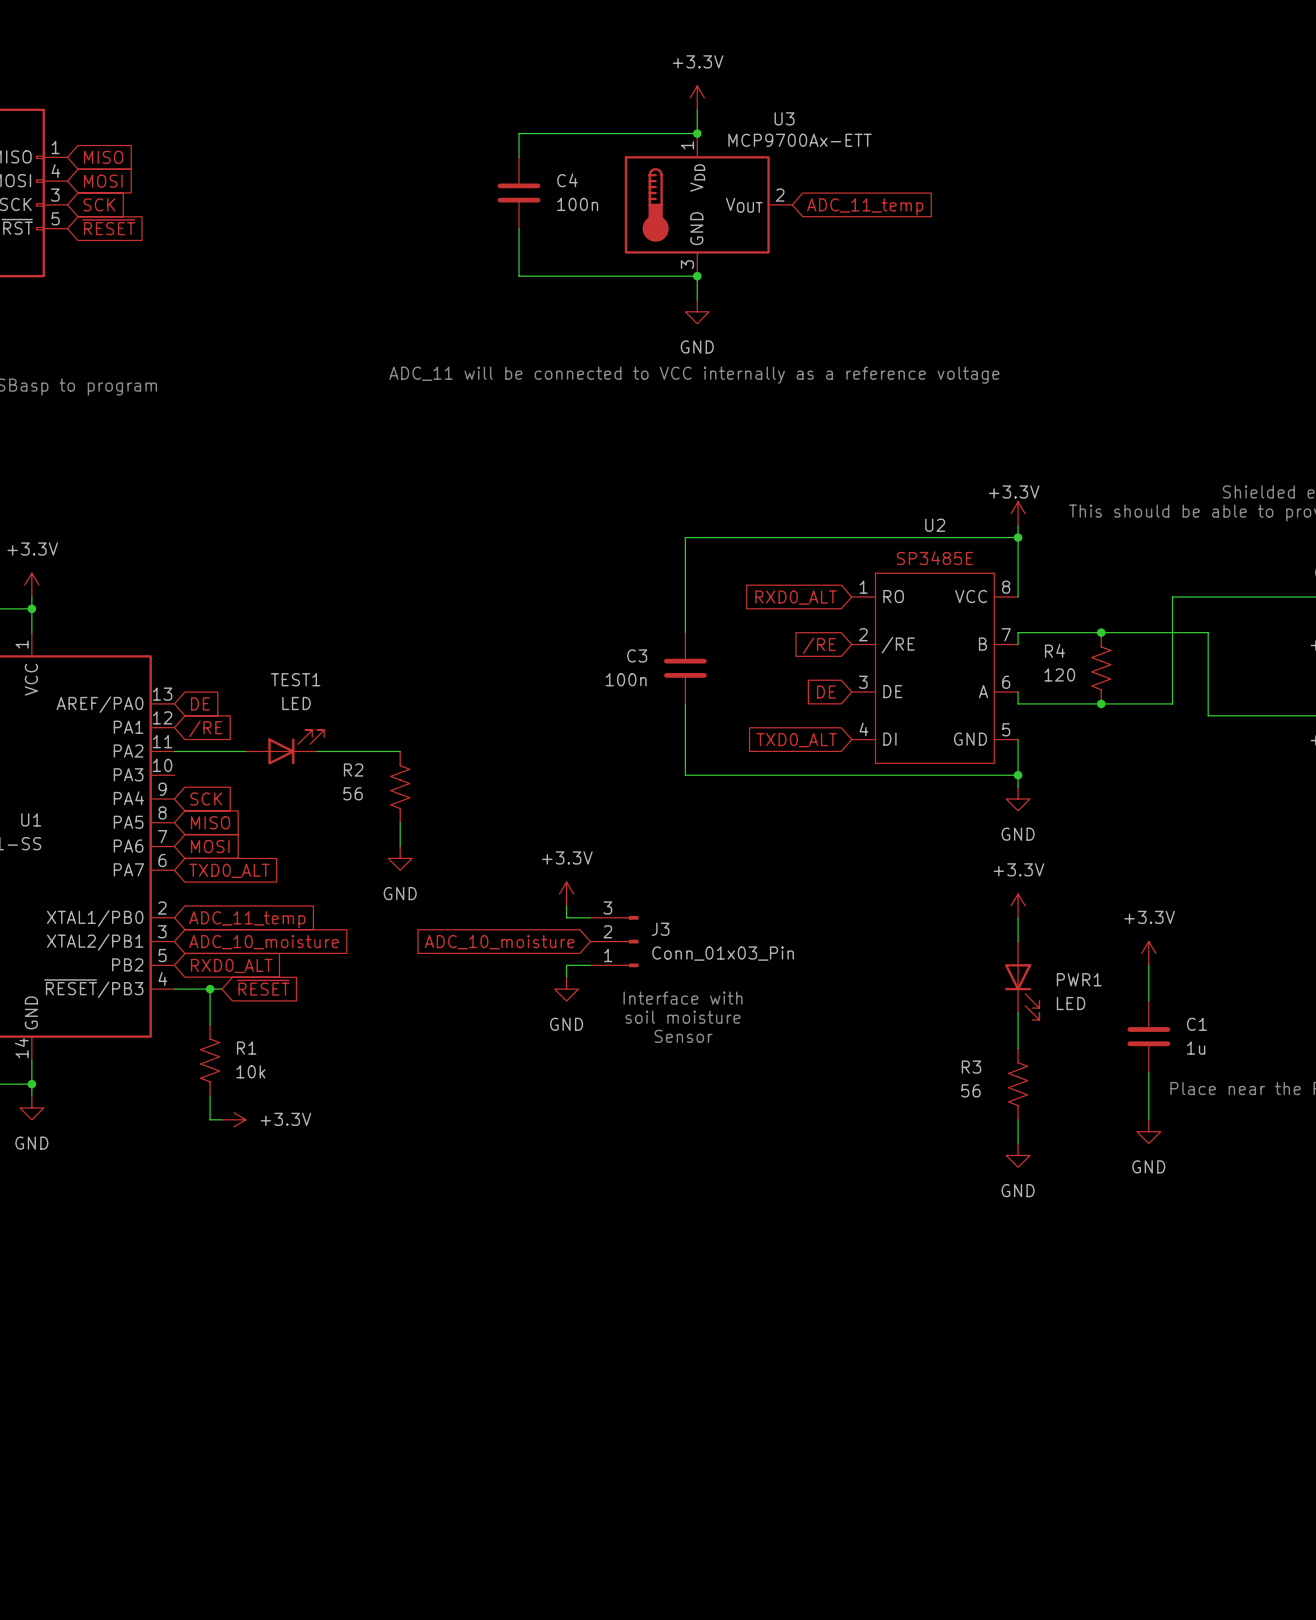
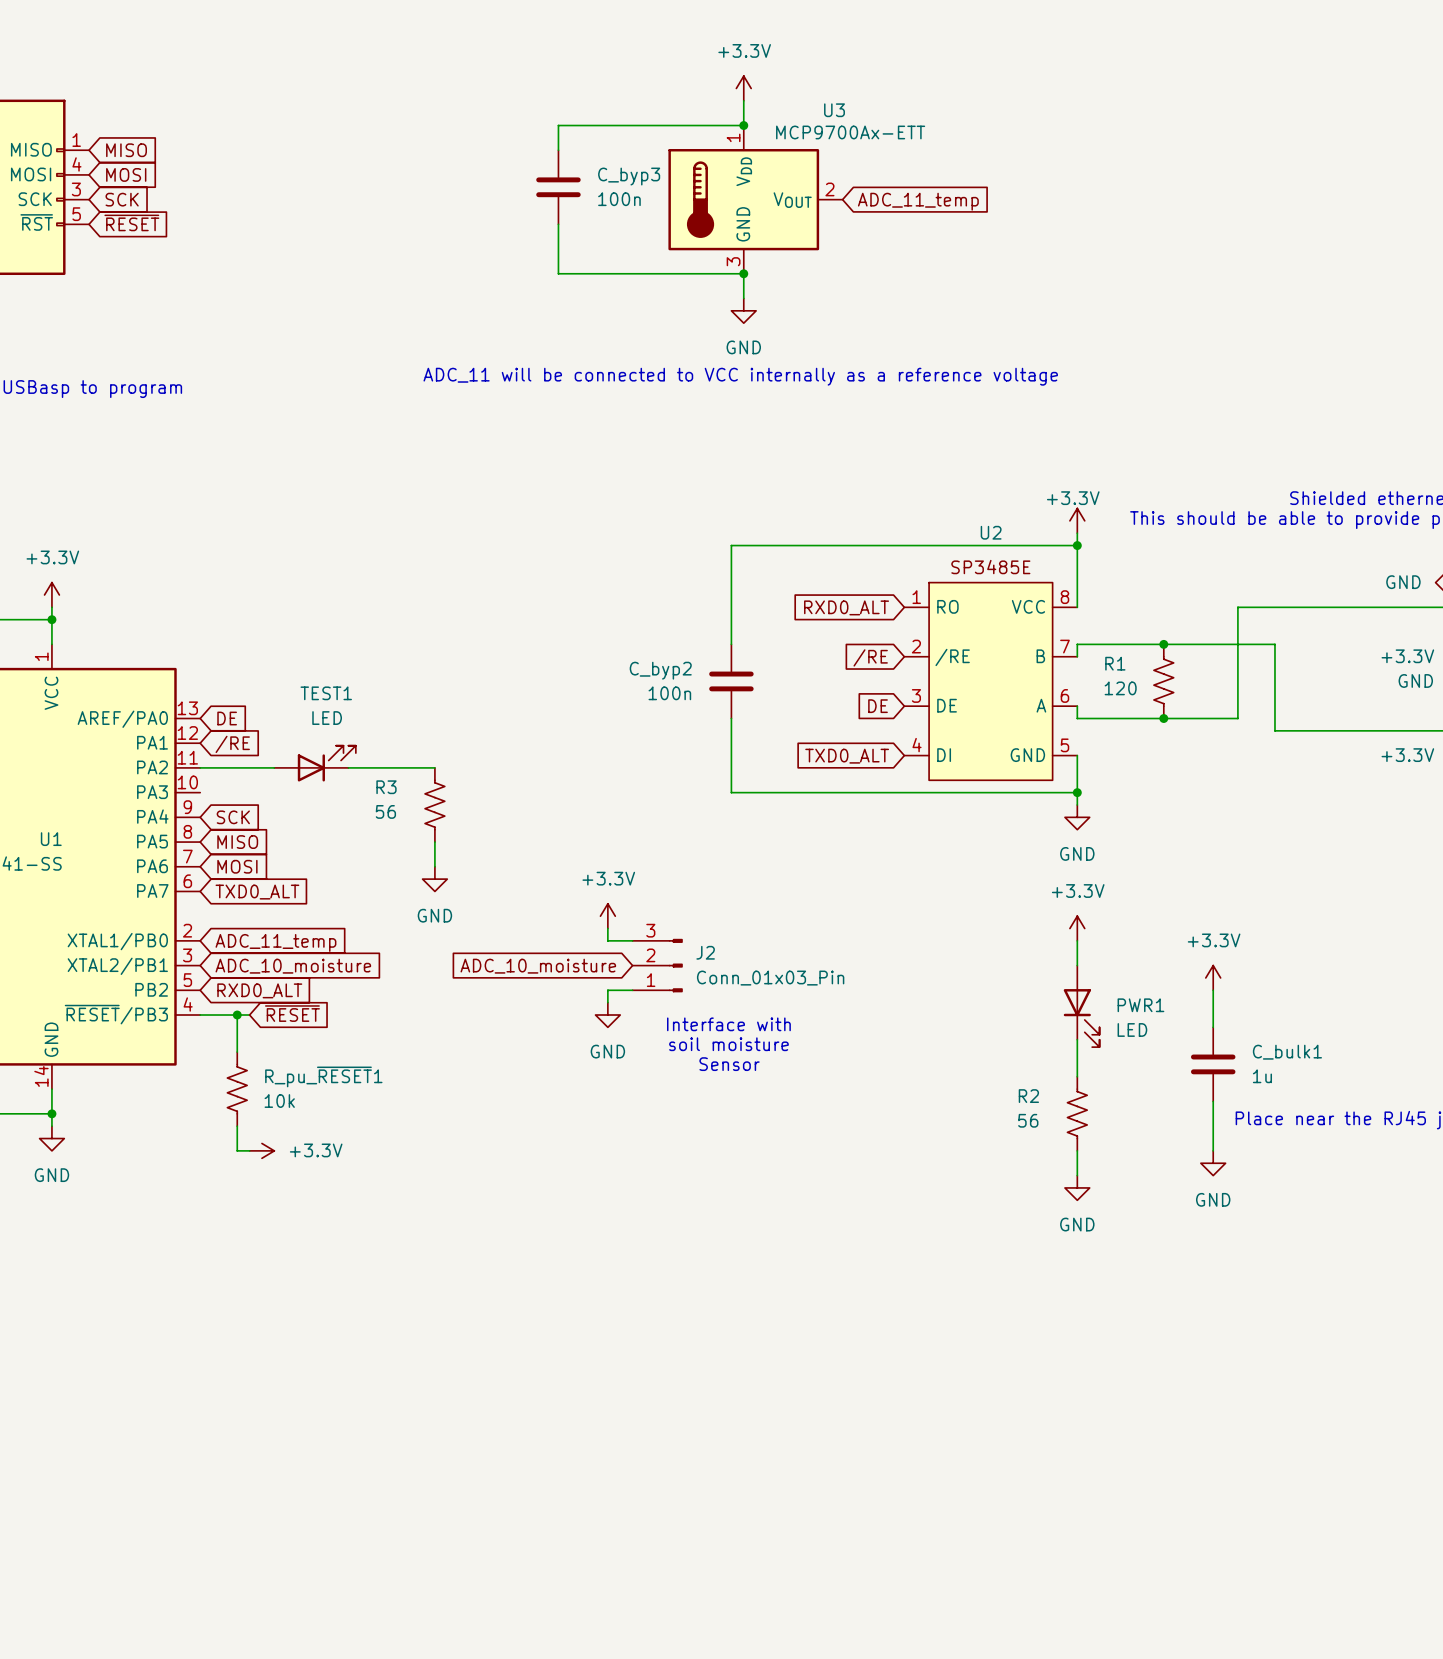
C4 name: C4 (567, 180) -> C_byp3 (629, 176)
R4 name: R4 (1054, 650) -> R1 (1115, 663)
C3 name: C3 (637, 655) -> C_byp2 (660, 670)
R2 name: R2 (353, 770) -> R3 (386, 787)
J3 name: J3 (660, 929) -> J2 (705, 952)
C1 name: C1 (1196, 1024) -> C_bulk1 (1287, 1052)
R1 name: R1 (246, 1048) -> R_pu_~{RESET}1 (323, 1076)
R3 name: R3 (971, 1067) -> R2 (1028, 1096)

